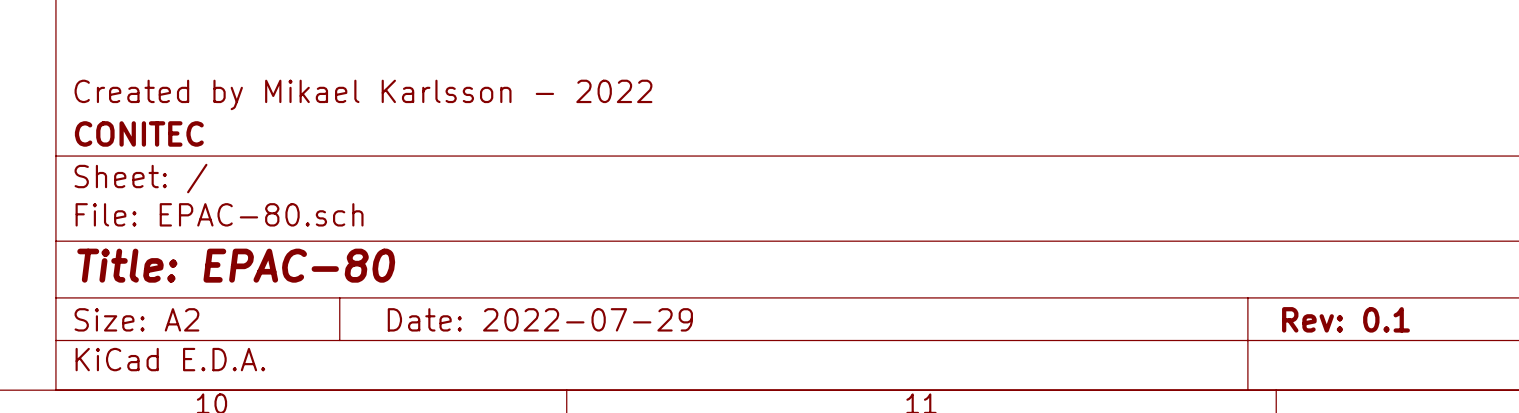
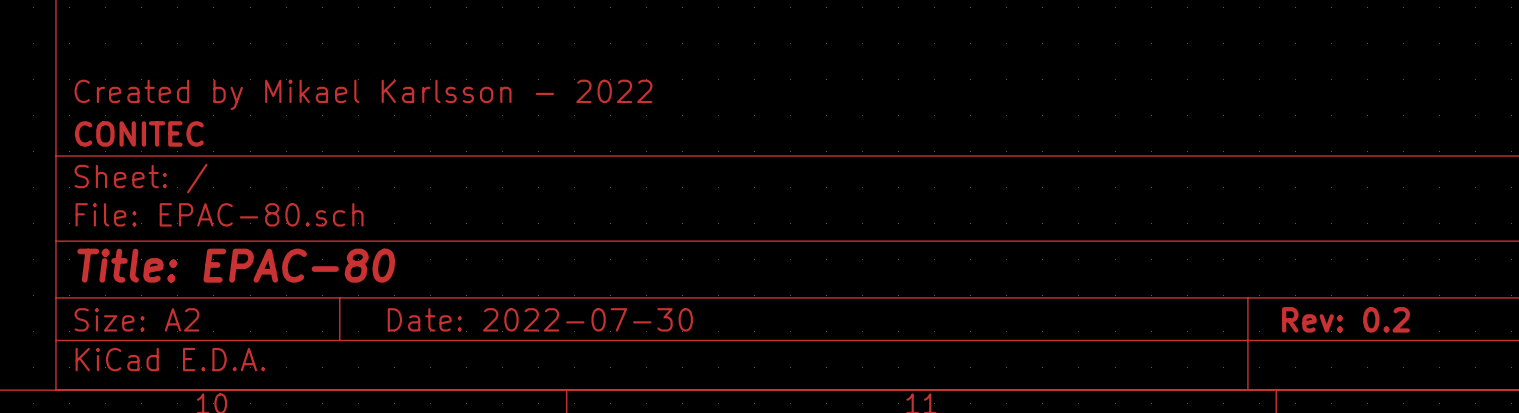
title block: Date: 2022-07-29 (540, 319) -> Date: 2022-07-30 (540, 319)
title block: Rev: 0.1 (1345, 319) -> Rev: 0.2 (1345, 319)

